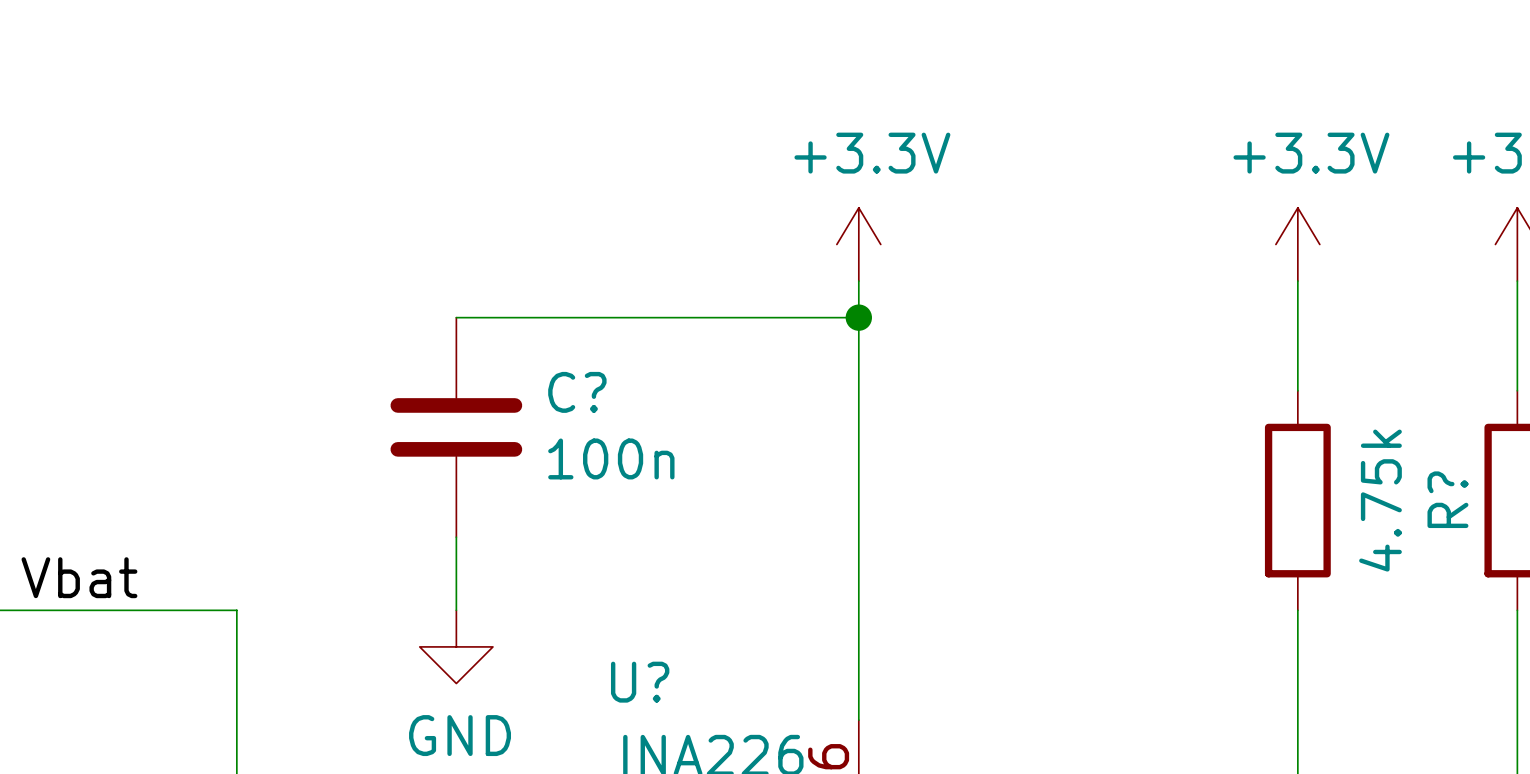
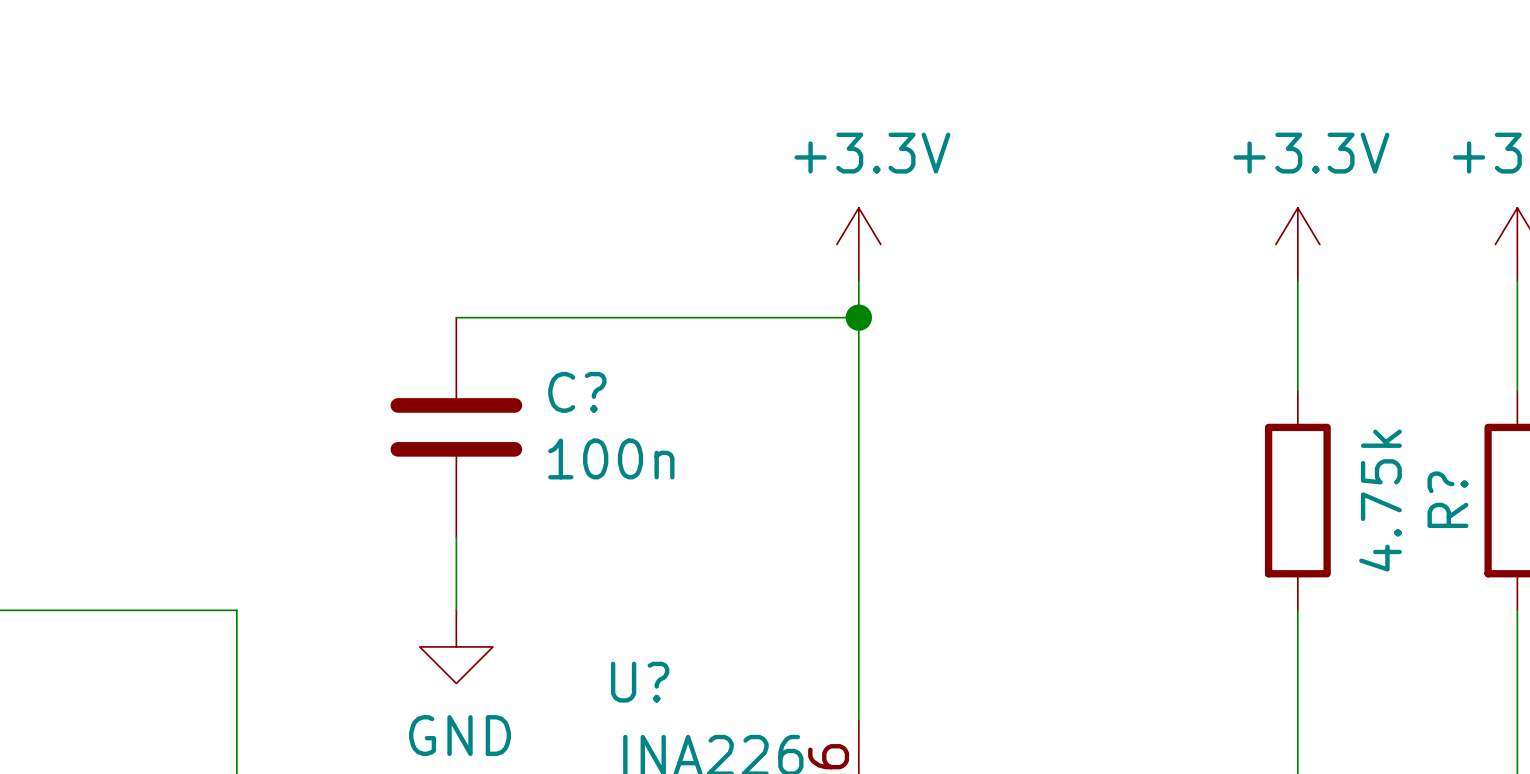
label: Vbat (79, 577) -> none

